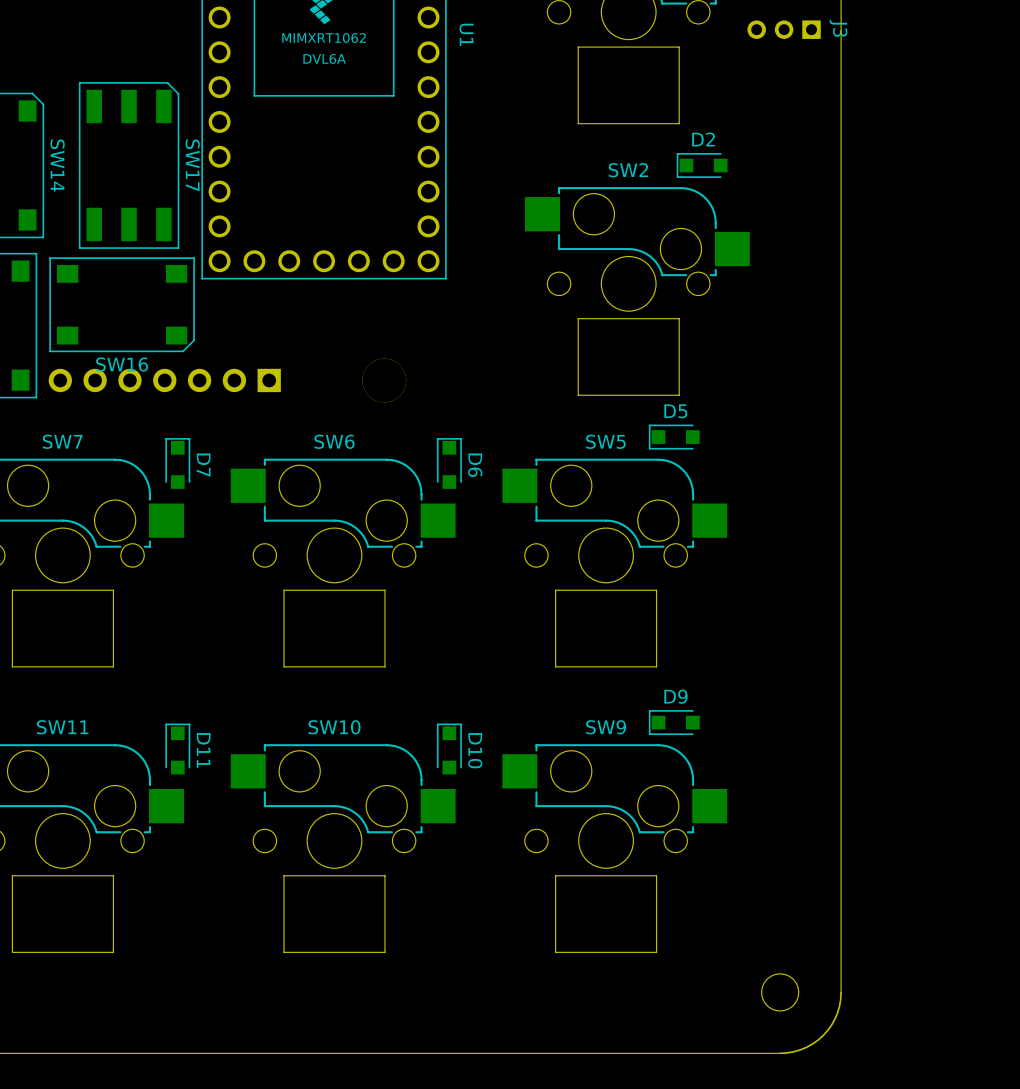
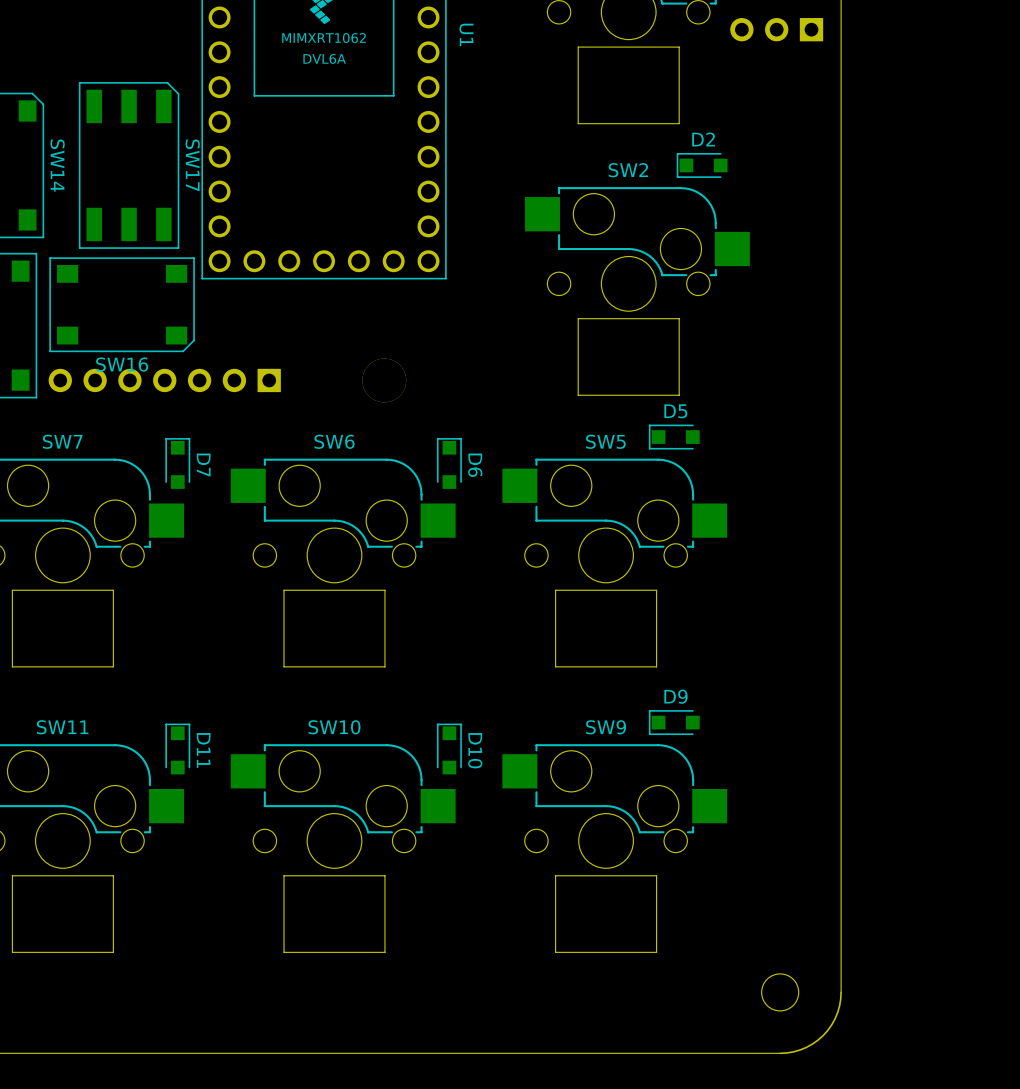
part: none -> (776, 29)
J3: (784, 29) -> none

